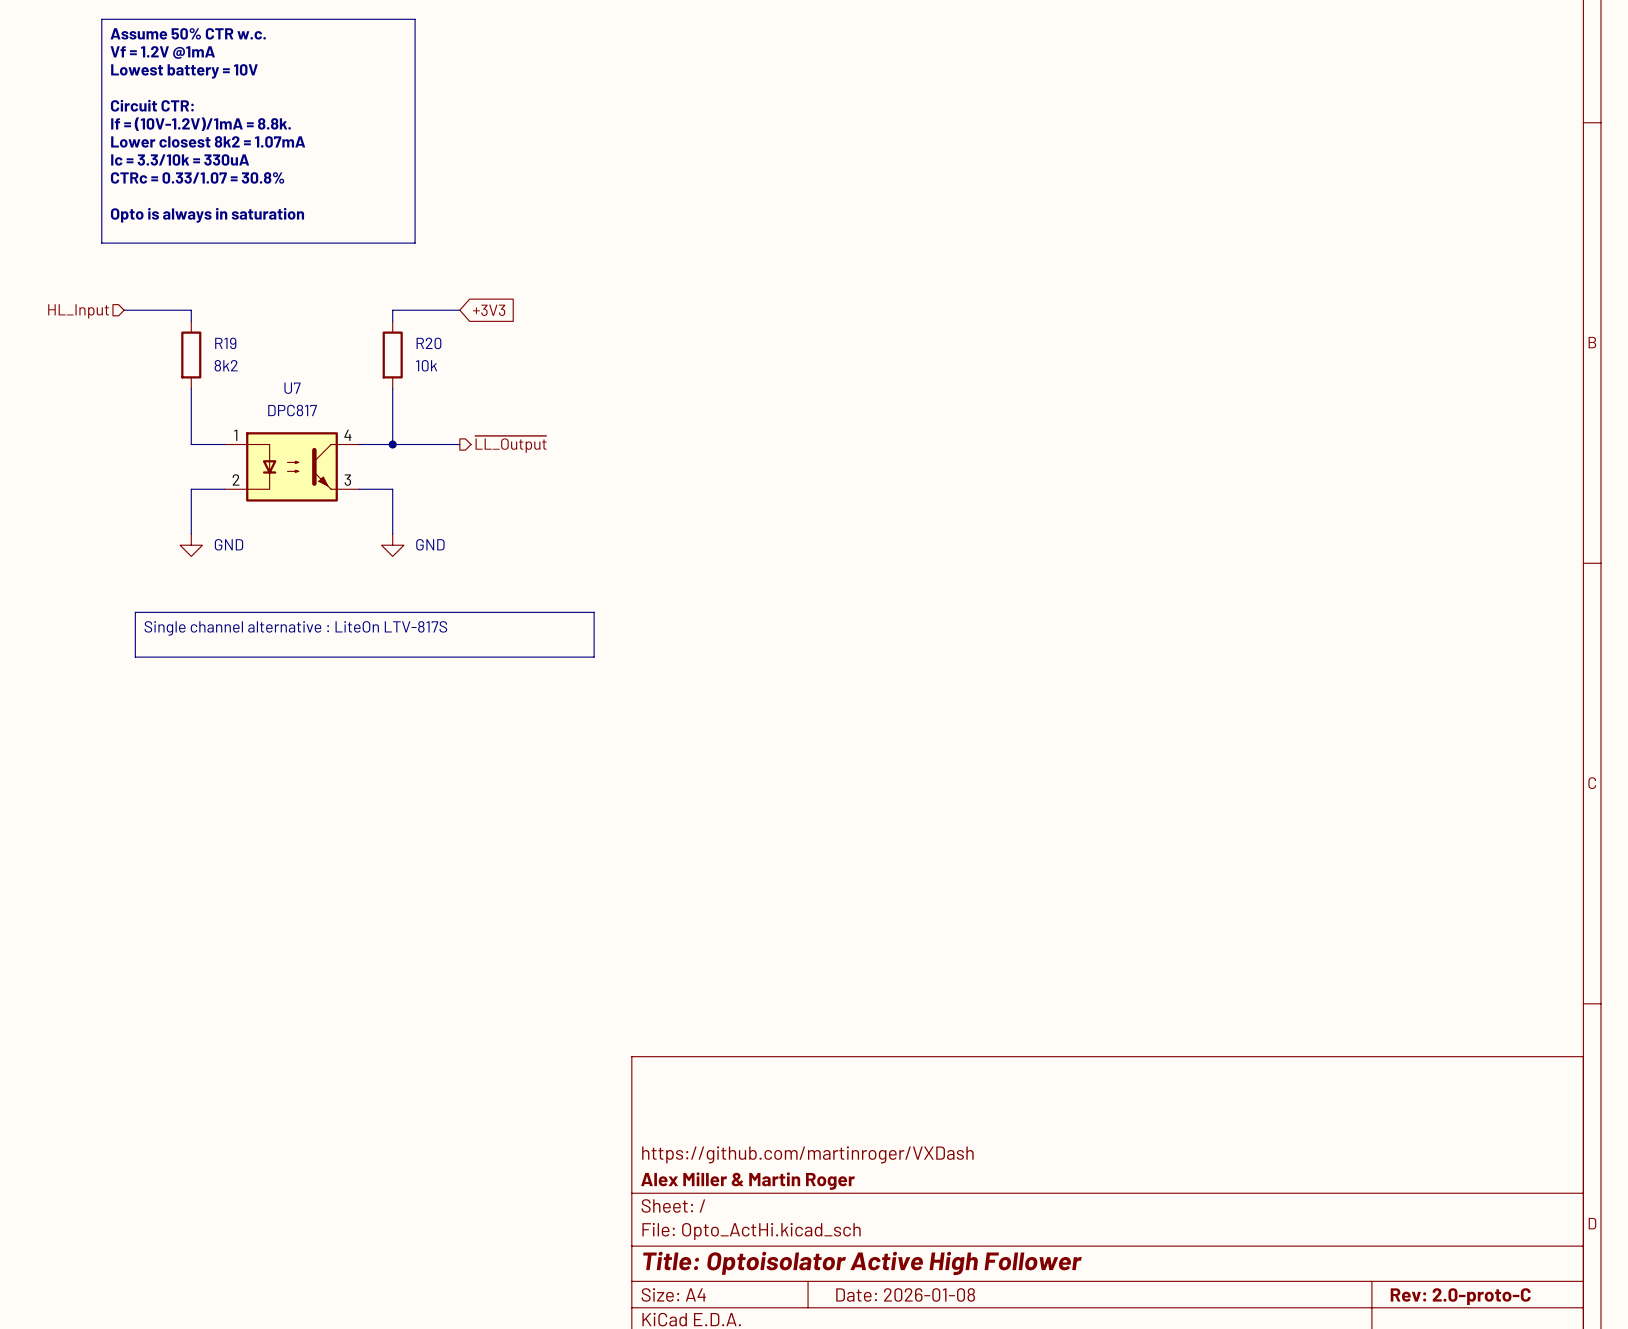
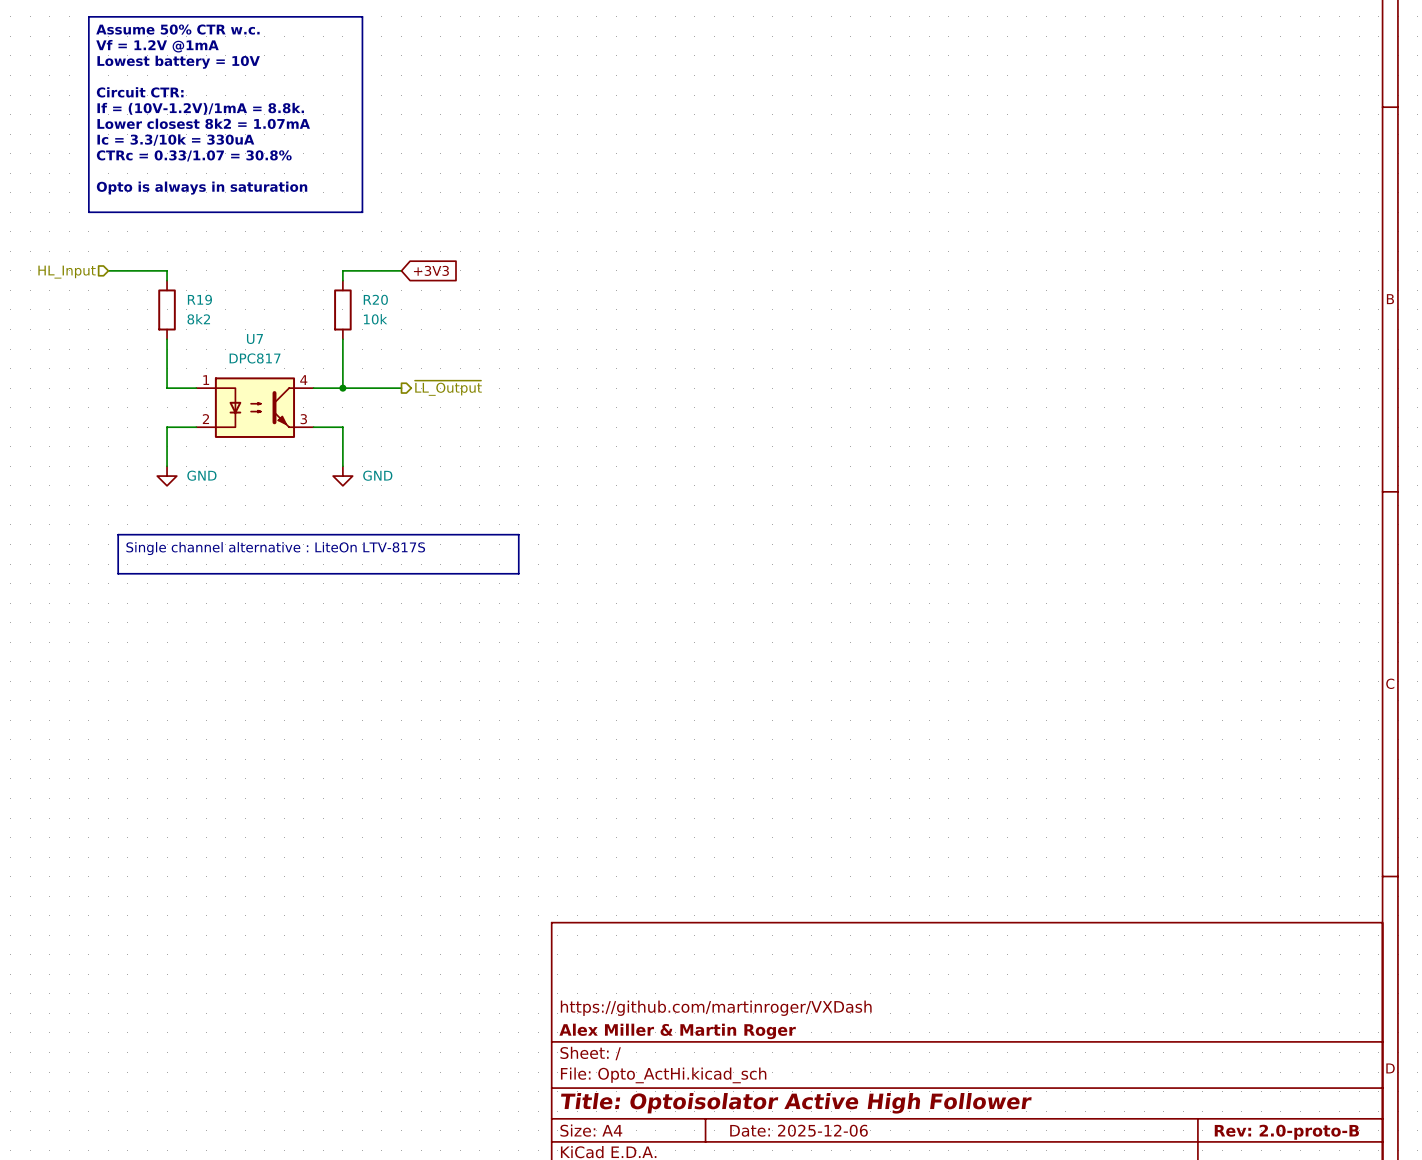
title block: Date: 2026-01-08 (905, 1294) -> Date: 2025-12-06 (799, 1130)
title block: Rev: 2.0-proto-C (1460, 1296) -> Rev: 2.0-proto-B (1286, 1132)

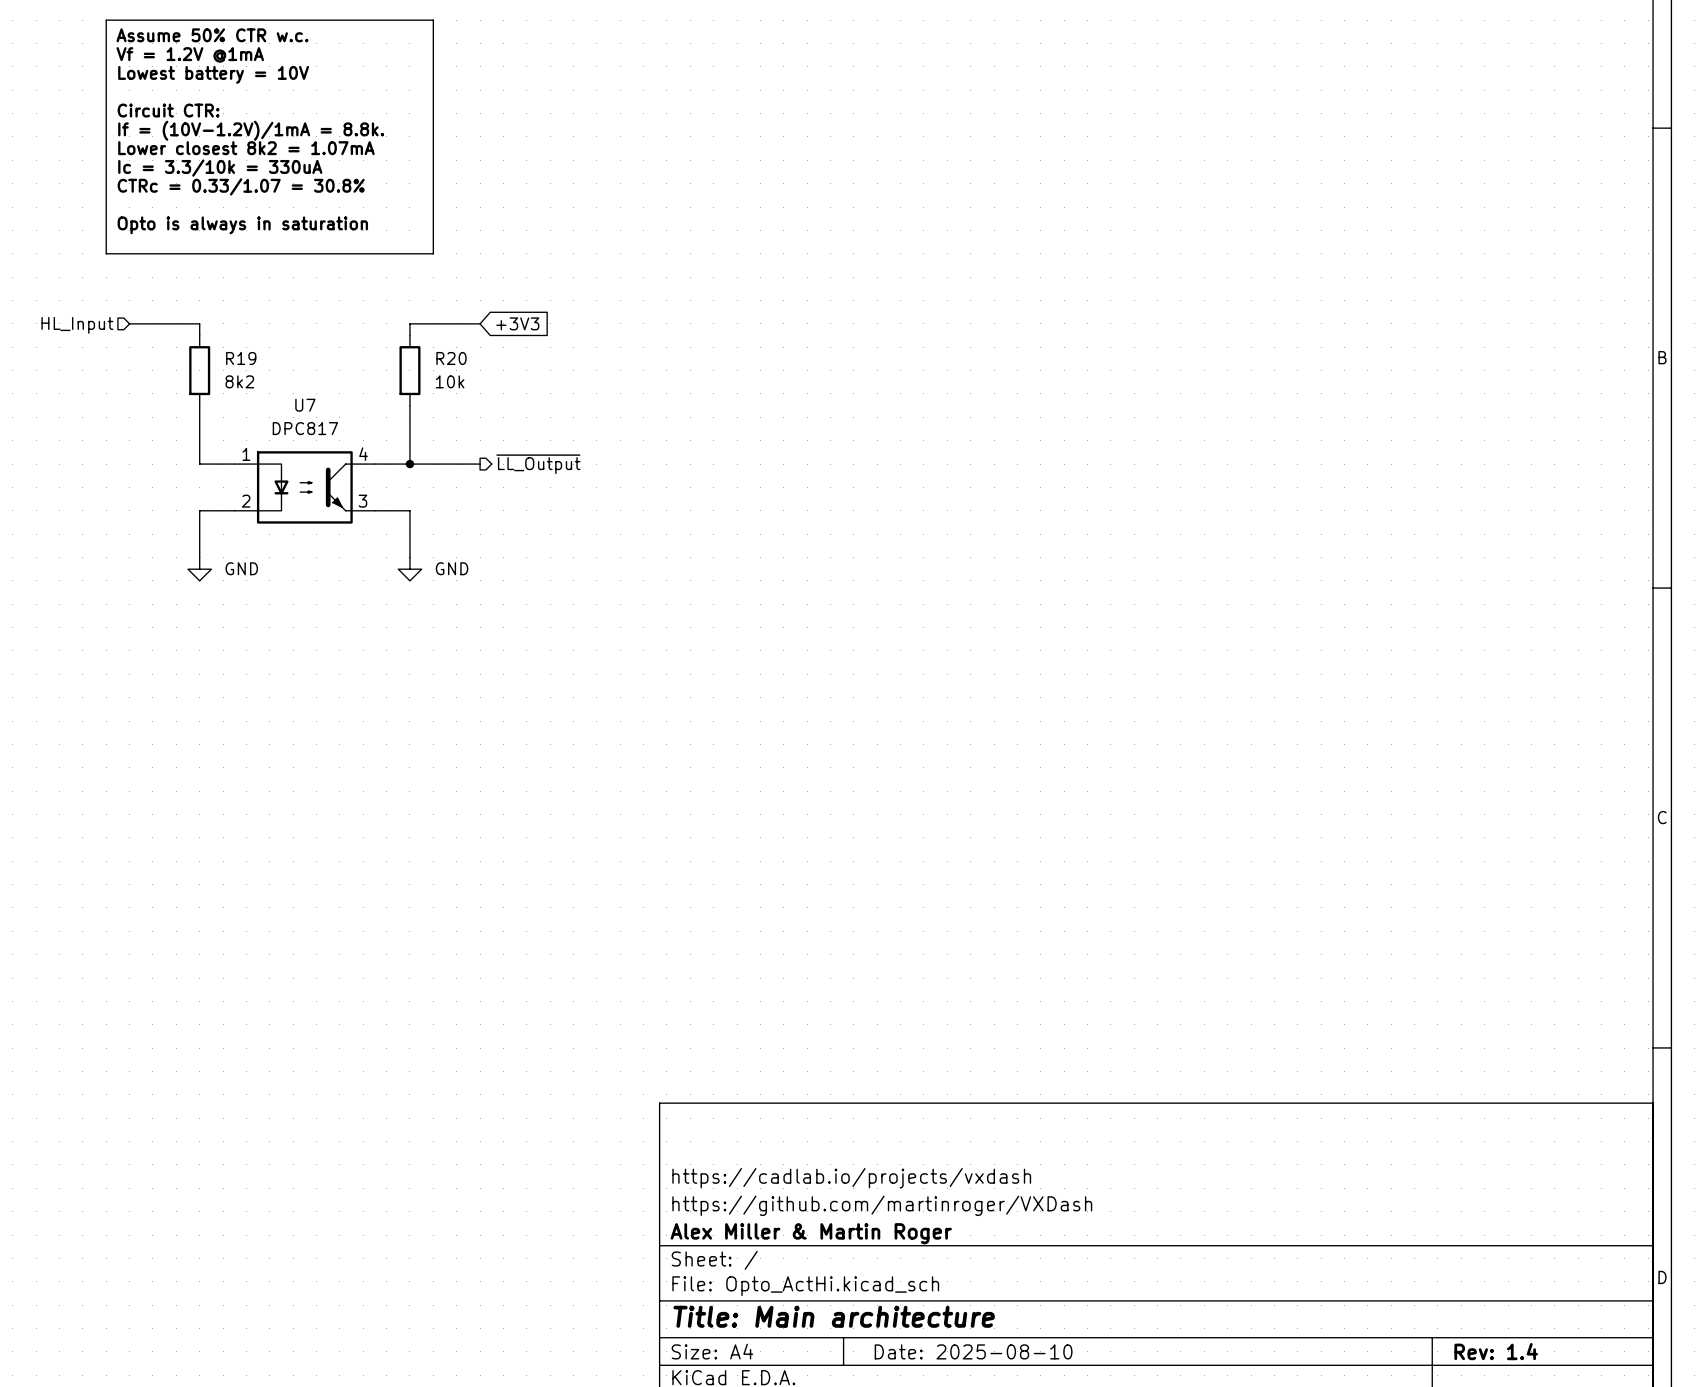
line: (118, 534) (518, 534) (518, 573) (118, 573) (118, 534) -> none
text: Single channel alternative : LiteOn LTV-817S (275, 548) -> none
title block: none -> https://cadlab.io/projects/vxdash (851, 1178)
title block: Title: Optoisolator Active High Follower (796, 1103) -> Title: Main architecture (834, 1316)
title block: Date: 2025-12-06 (799, 1130) -> Date: 2025-08-10 (973, 1351)
title block: Rev: 2.0-proto-B (1286, 1132) -> Rev: 1.4 (1496, 1351)

